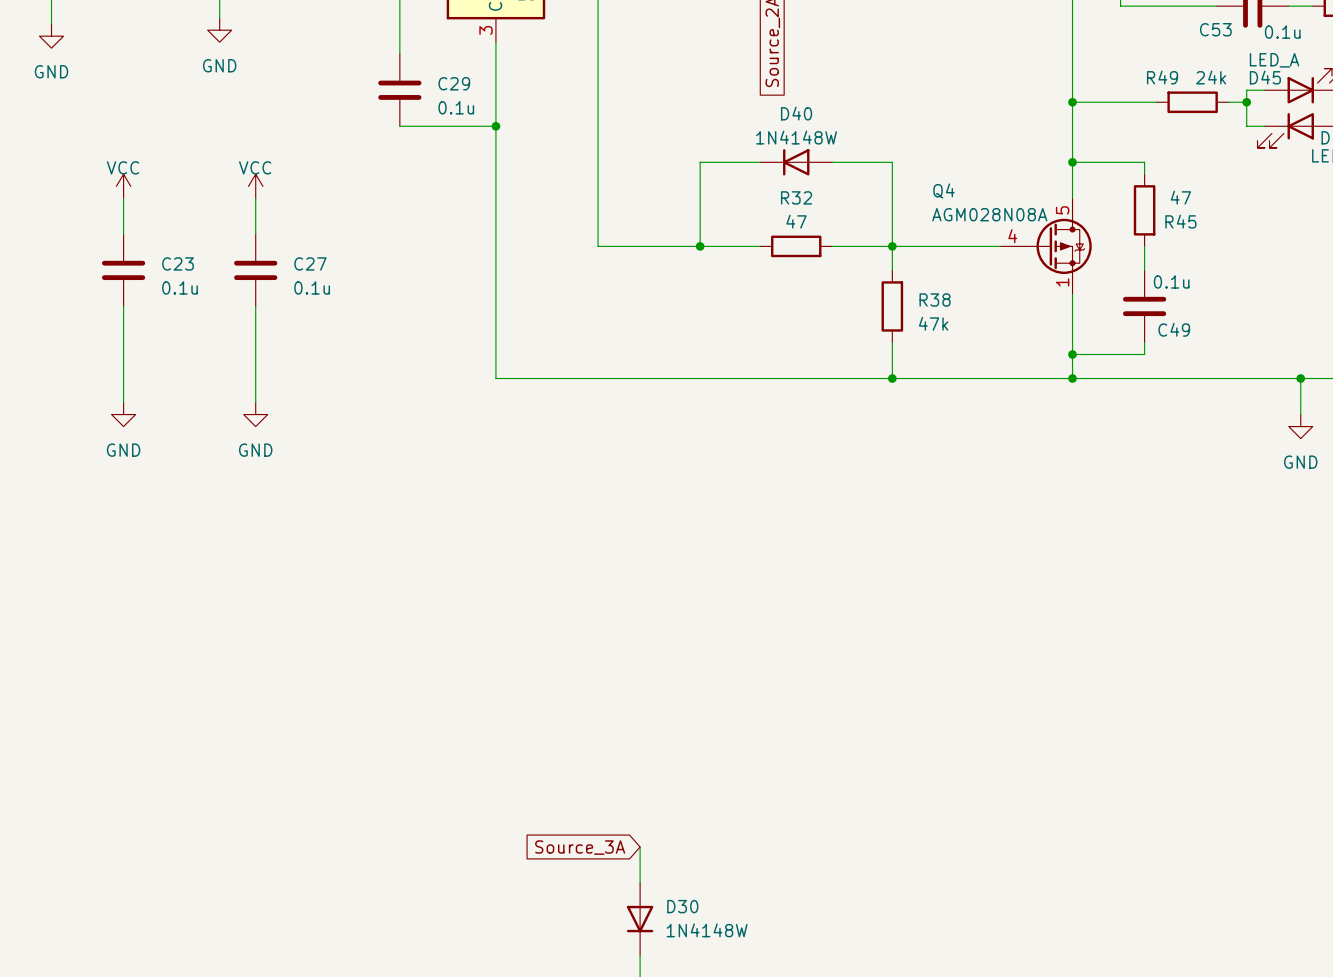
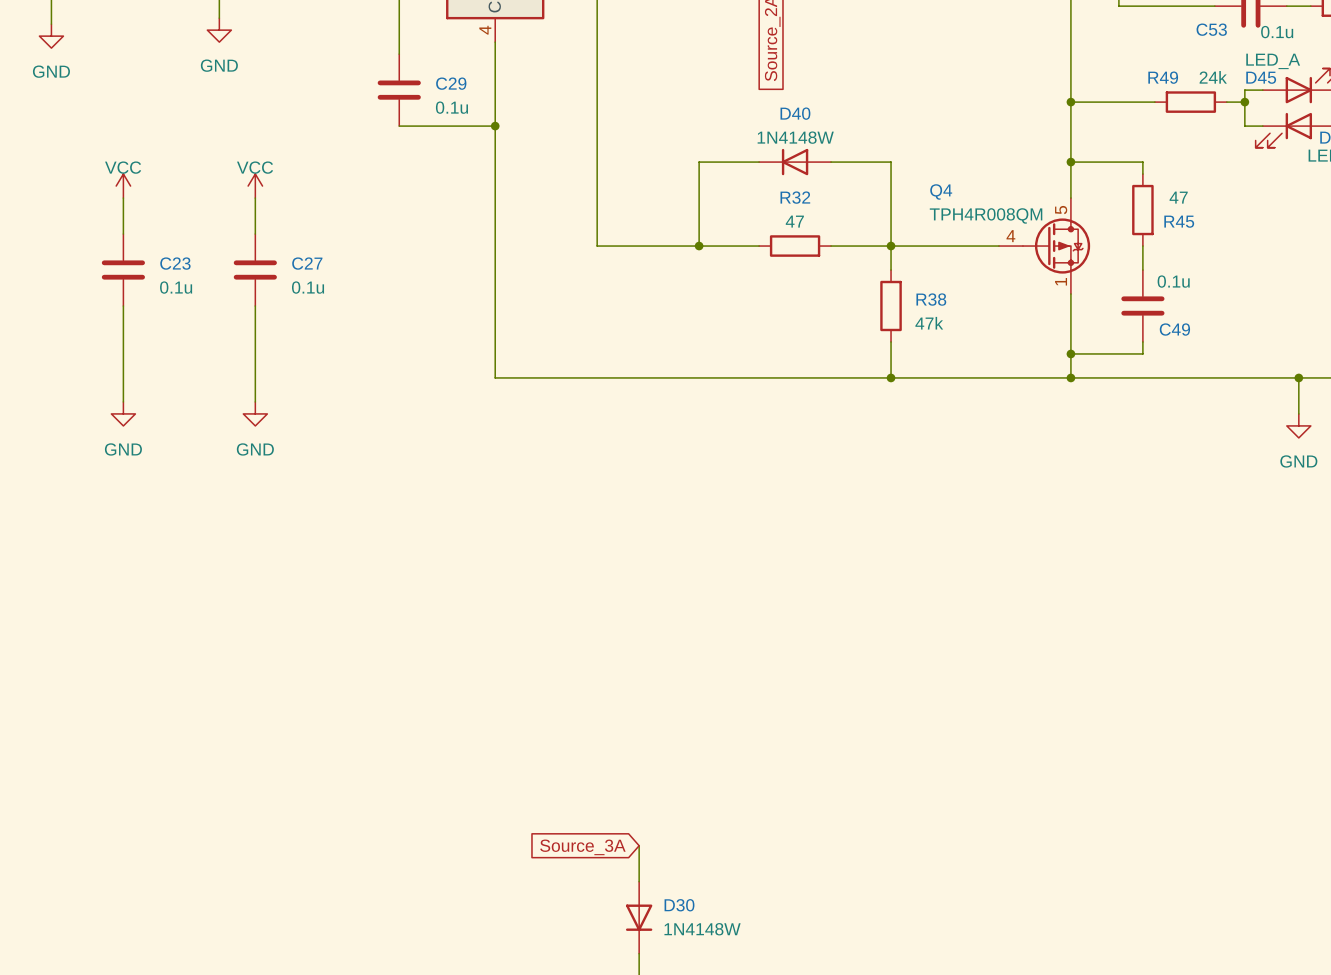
part pin number: 3 (486, 30) -> 4 (485, 30)
Q4 value: AGM028N08A (989, 214) -> TPH4R008QM (986, 215)

